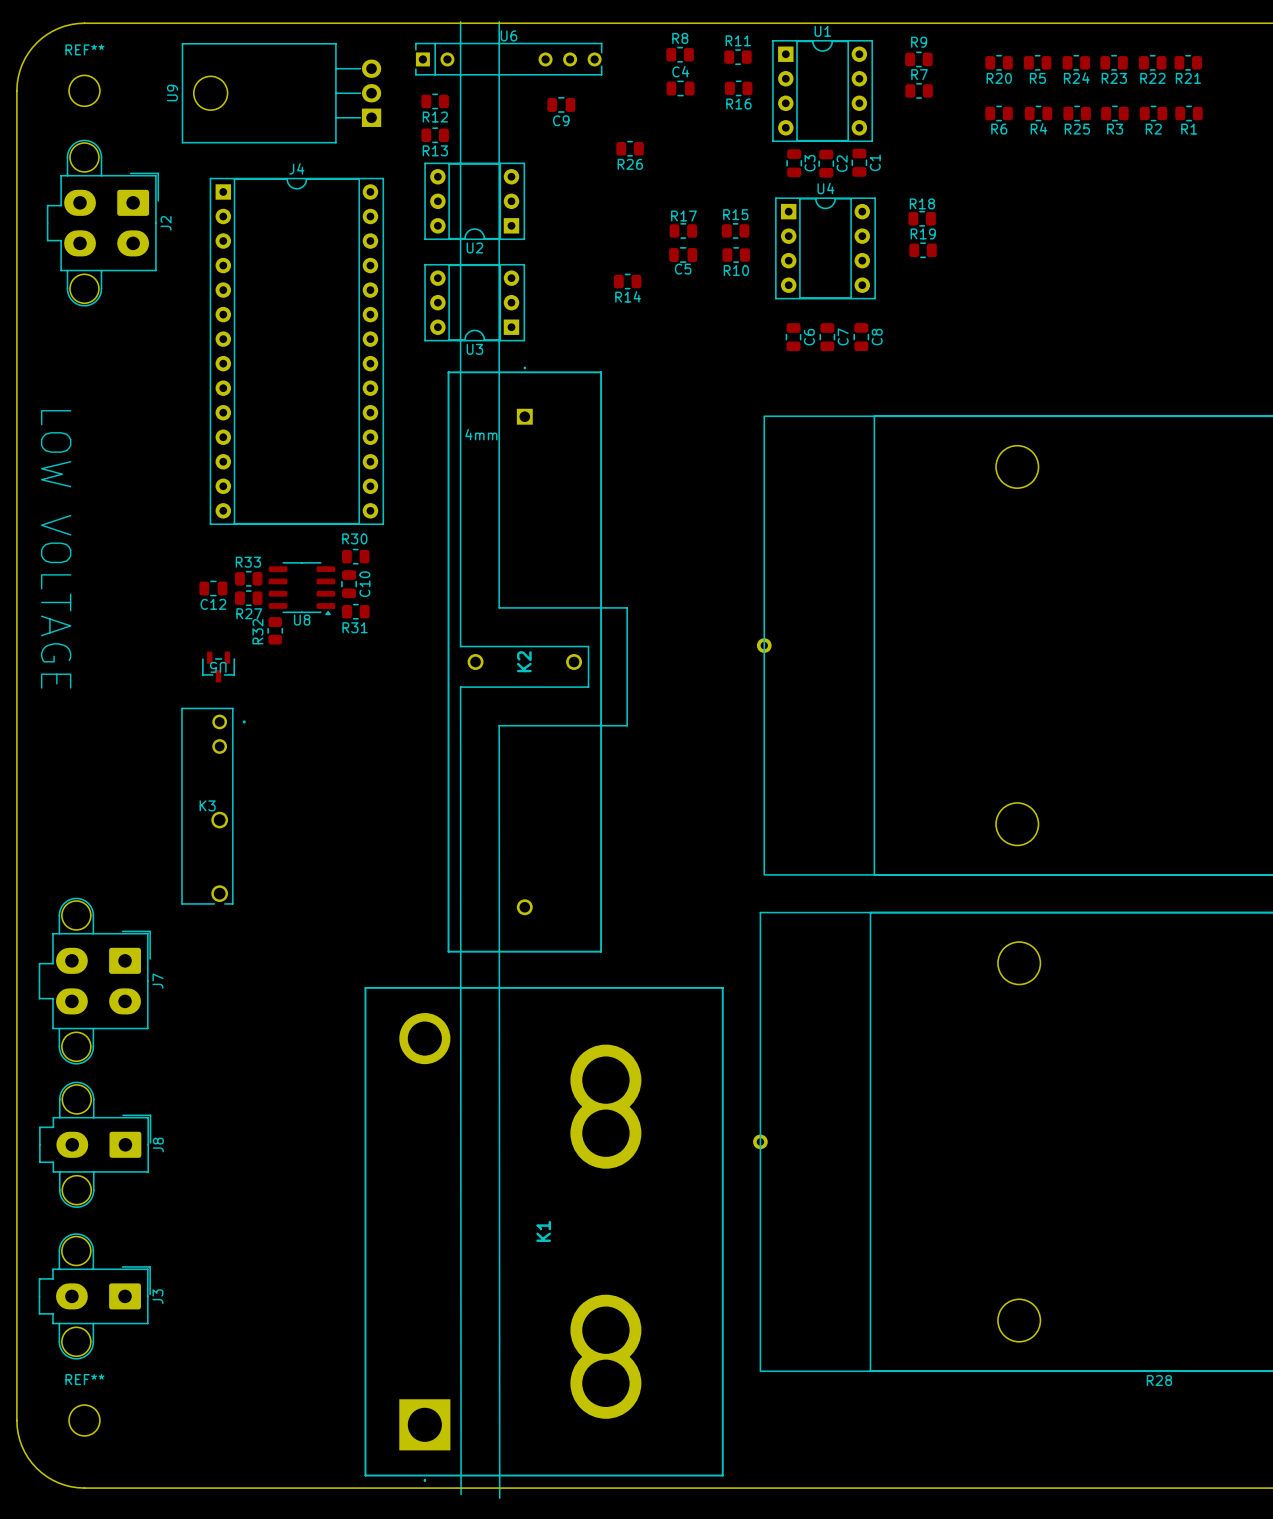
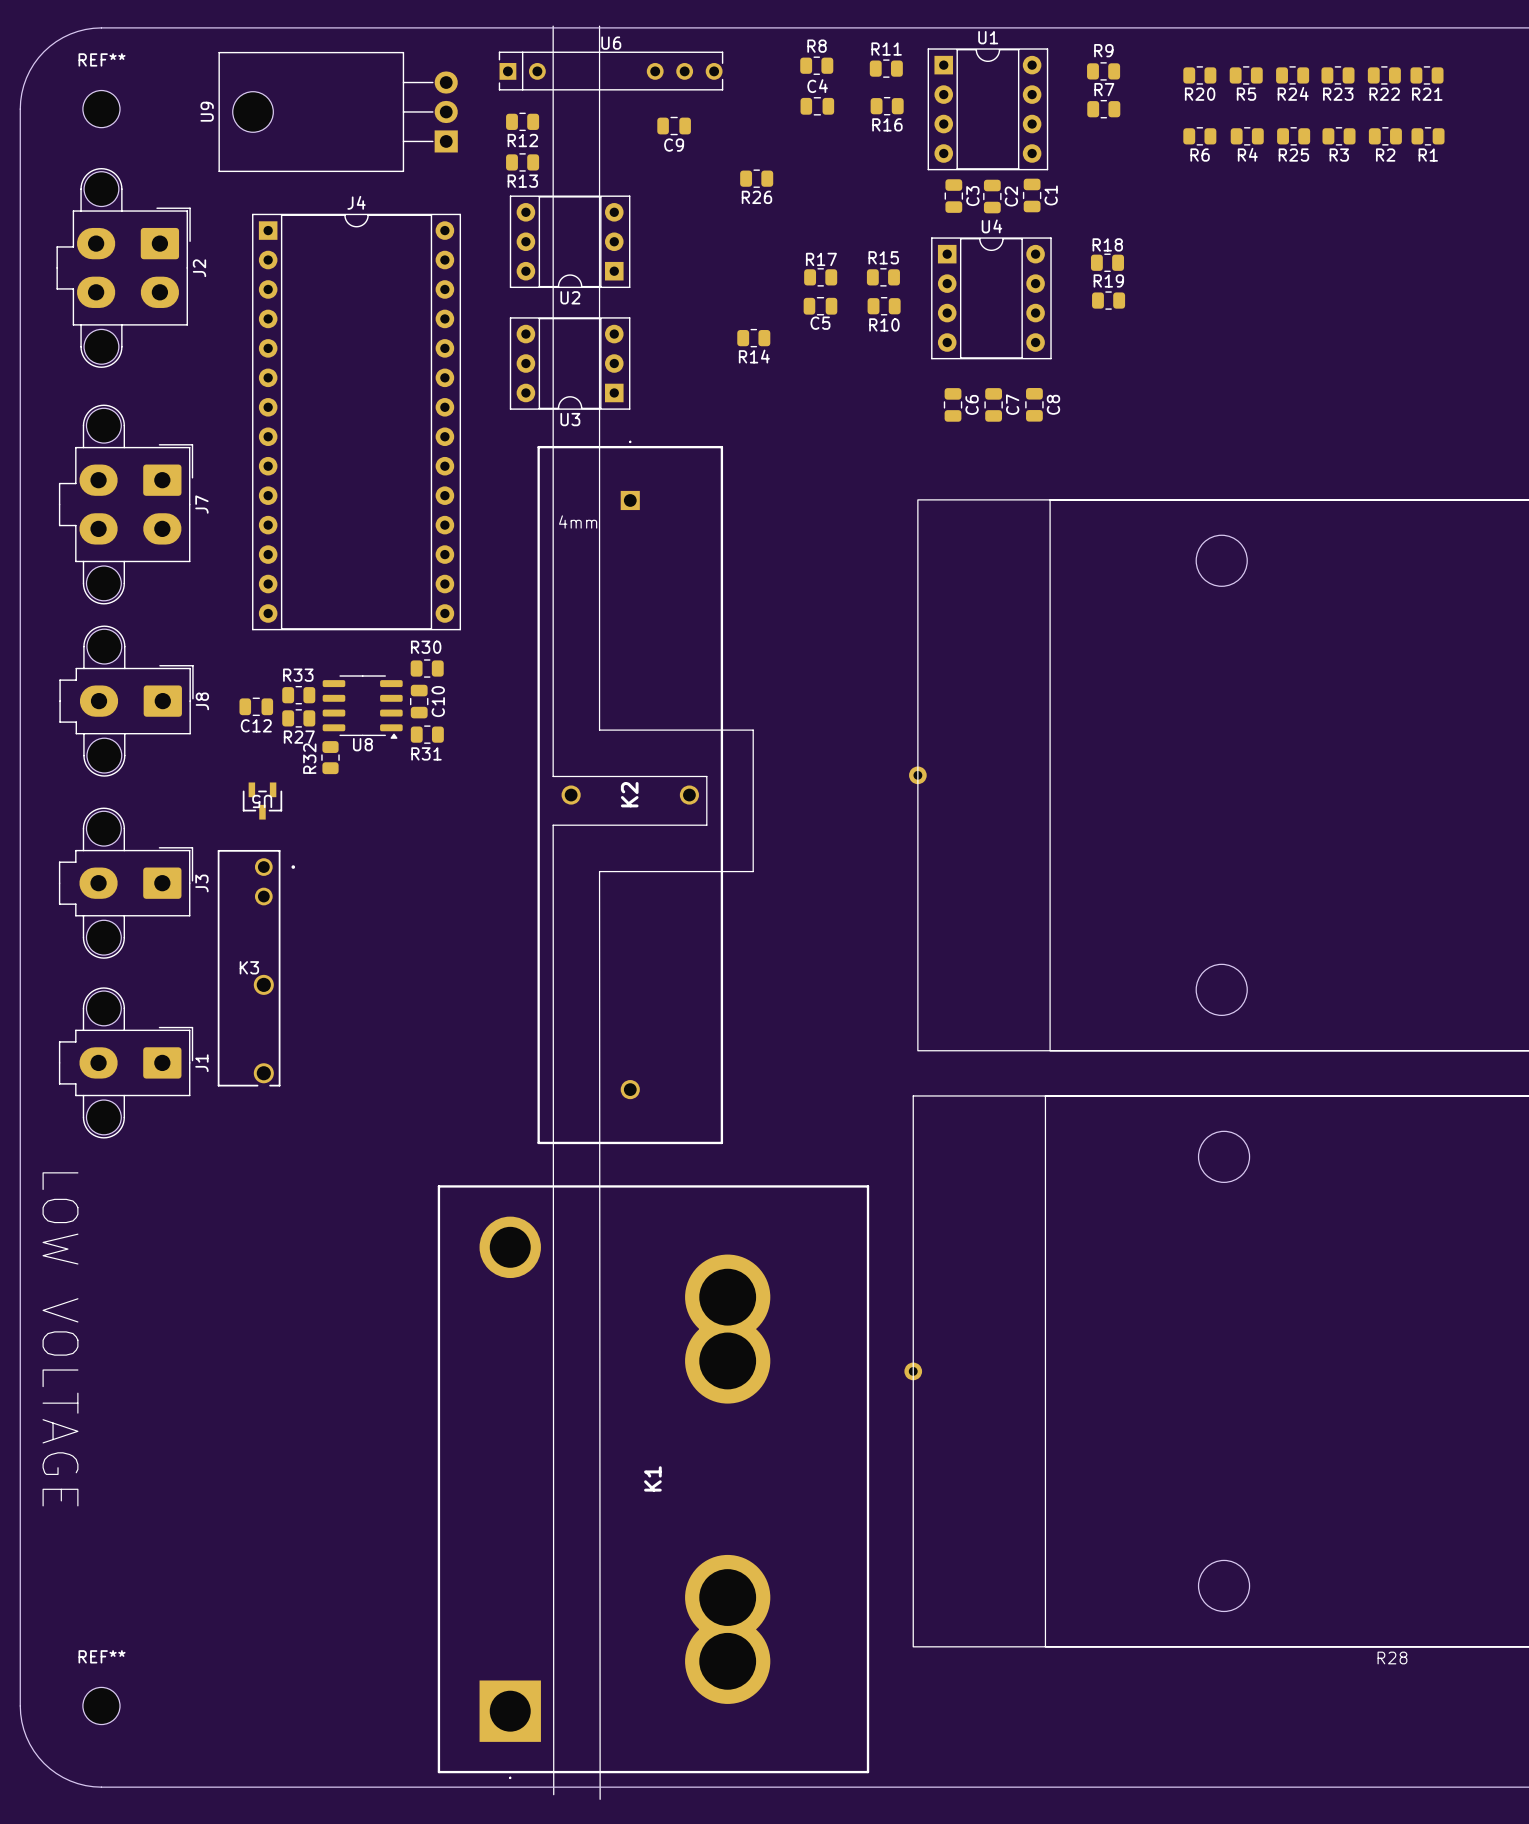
text: LOW VOLTAGE (56, 549) -> none
J1: none -> (126, 1062)
J7 position: (94, 981) -> (126, 504)
text: none -> LOW VOLTAGE (60, 1339)
J8 position: (95, 1144) -> (126, 701)
J3 position: (94, 1296) -> (126, 883)

